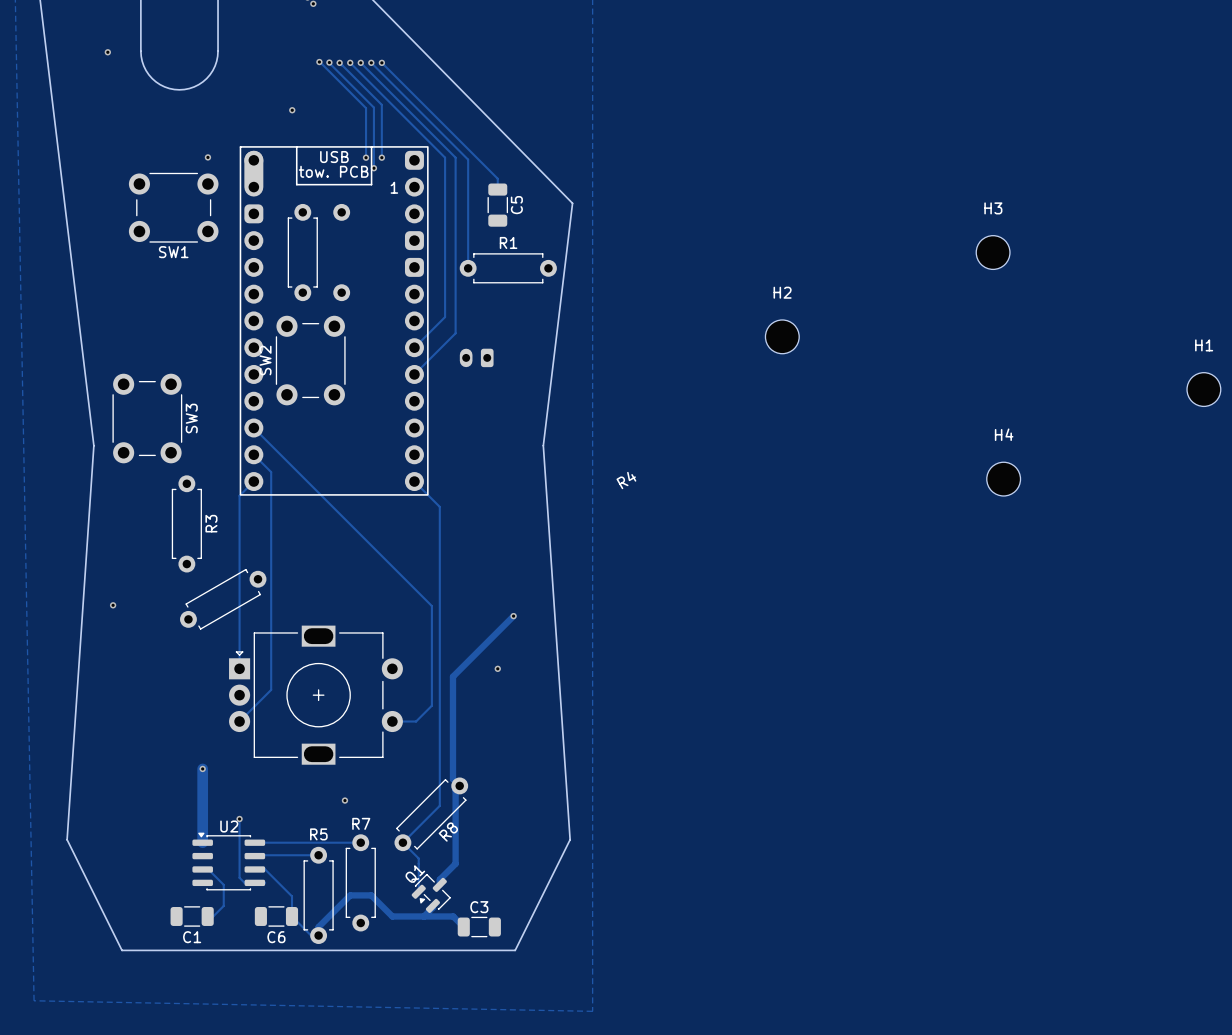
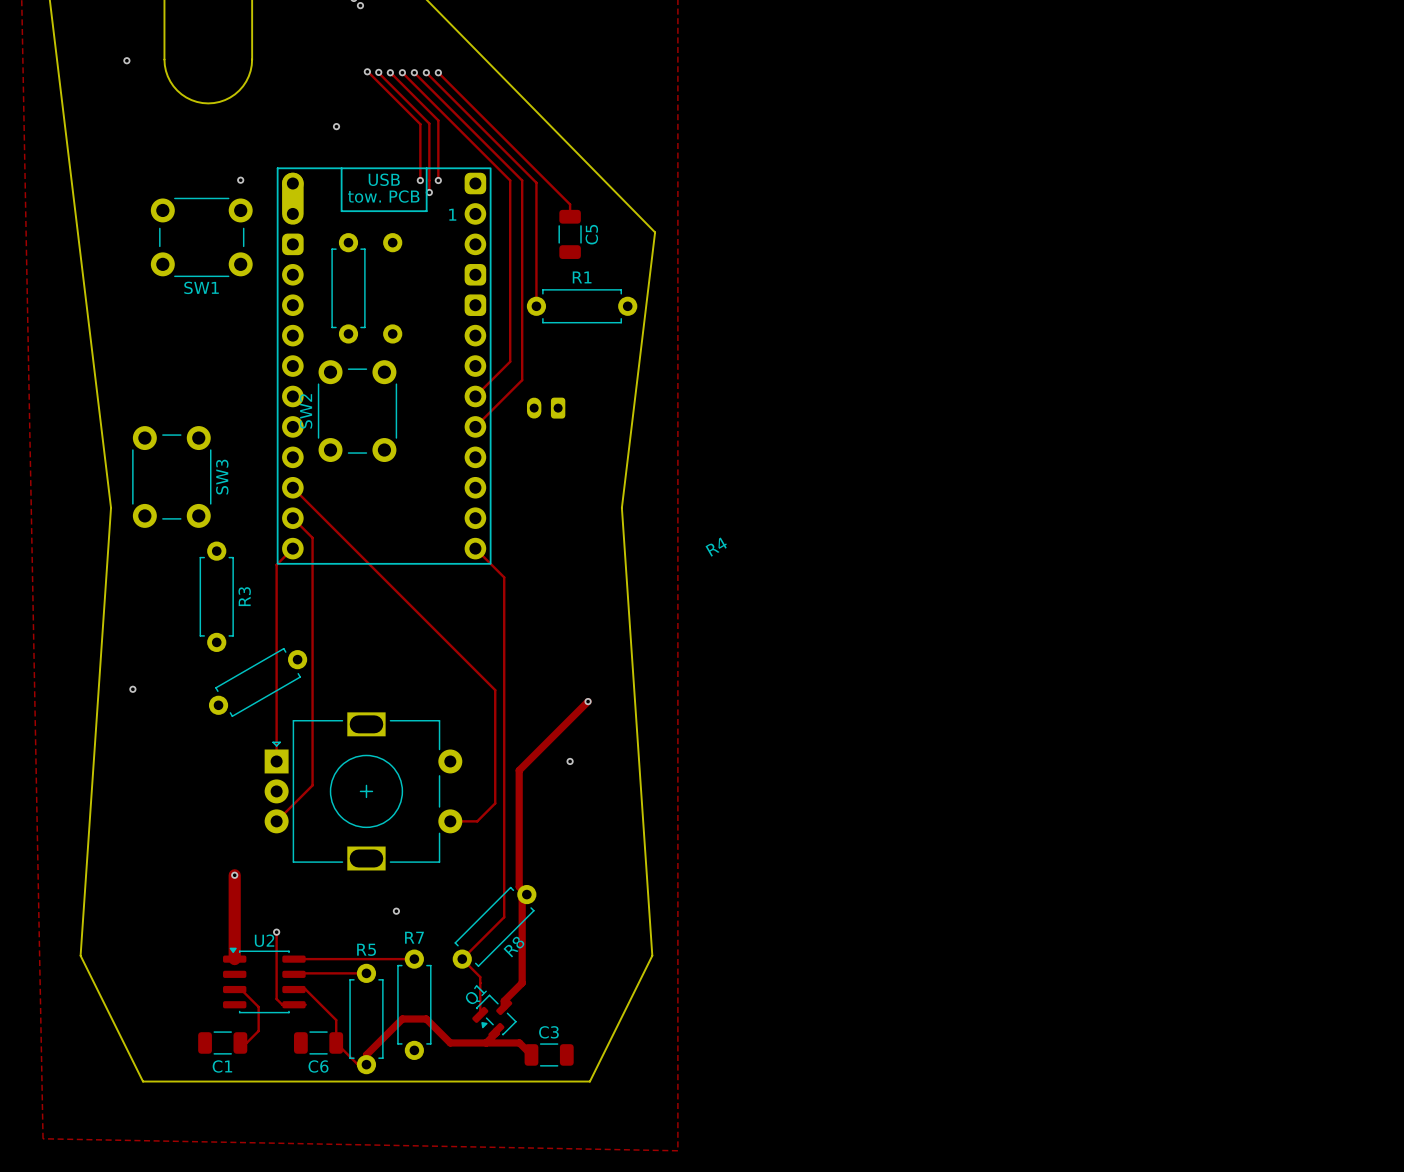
H3: (993, 252) -> none
H2: (782, 336) -> none
H1: (1203, 389) -> none
H4: (1003, 479) -> none

